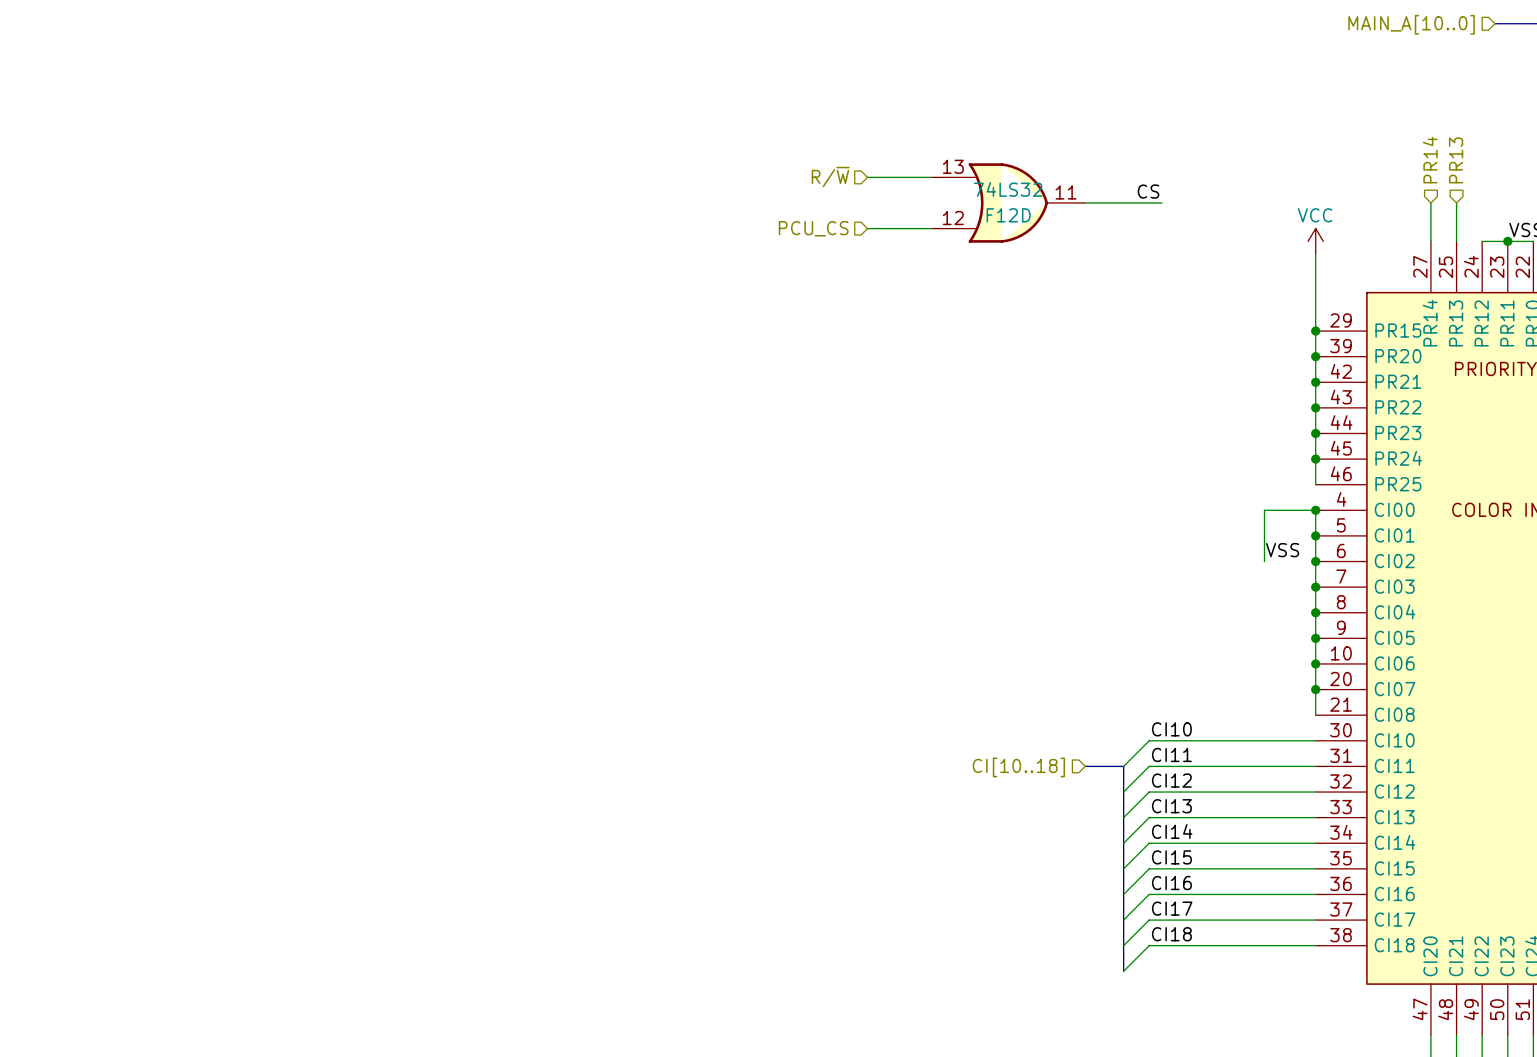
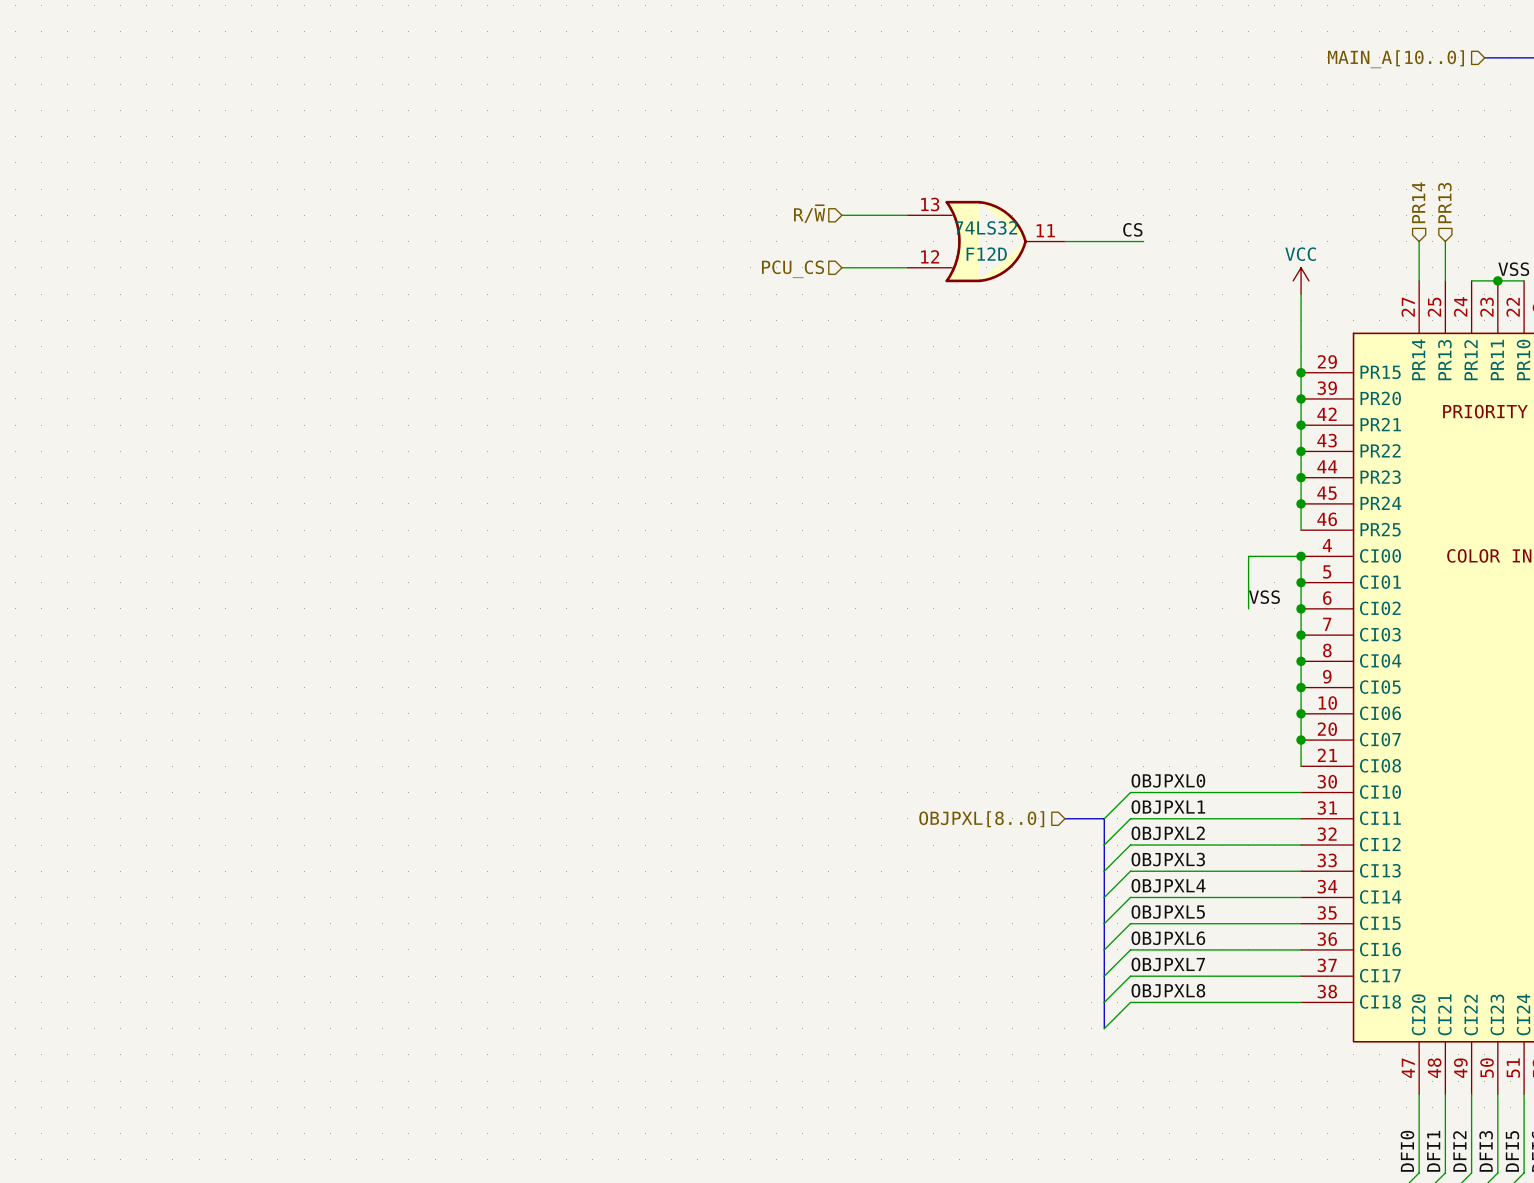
label: CI10 (1171, 729) -> OBJPXL0 (1168, 780)
label: CI11 (1171, 754) -> OBJPXL1 (1168, 807)
hierarchical label: CI[10..18] (1018, 767) -> OBJPXL[8..0] (981, 819)
label: CI12 (1171, 780) -> OBJPXL2 (1168, 833)
label: CI13 (1171, 806) -> OBJPXL3 (1168, 859)
label: CI14 (1172, 831) -> OBJPXL4 (1168, 885)
label: CI15 (1171, 857) -> OBJPXL5 (1168, 912)
label: CI16 (1171, 883) -> OBJPXL6 (1168, 938)
label: CI17 (1172, 908) -> OBJPXL7 (1168, 964)
label: CI18 (1171, 934) -> OBJPXL8 (1168, 990)

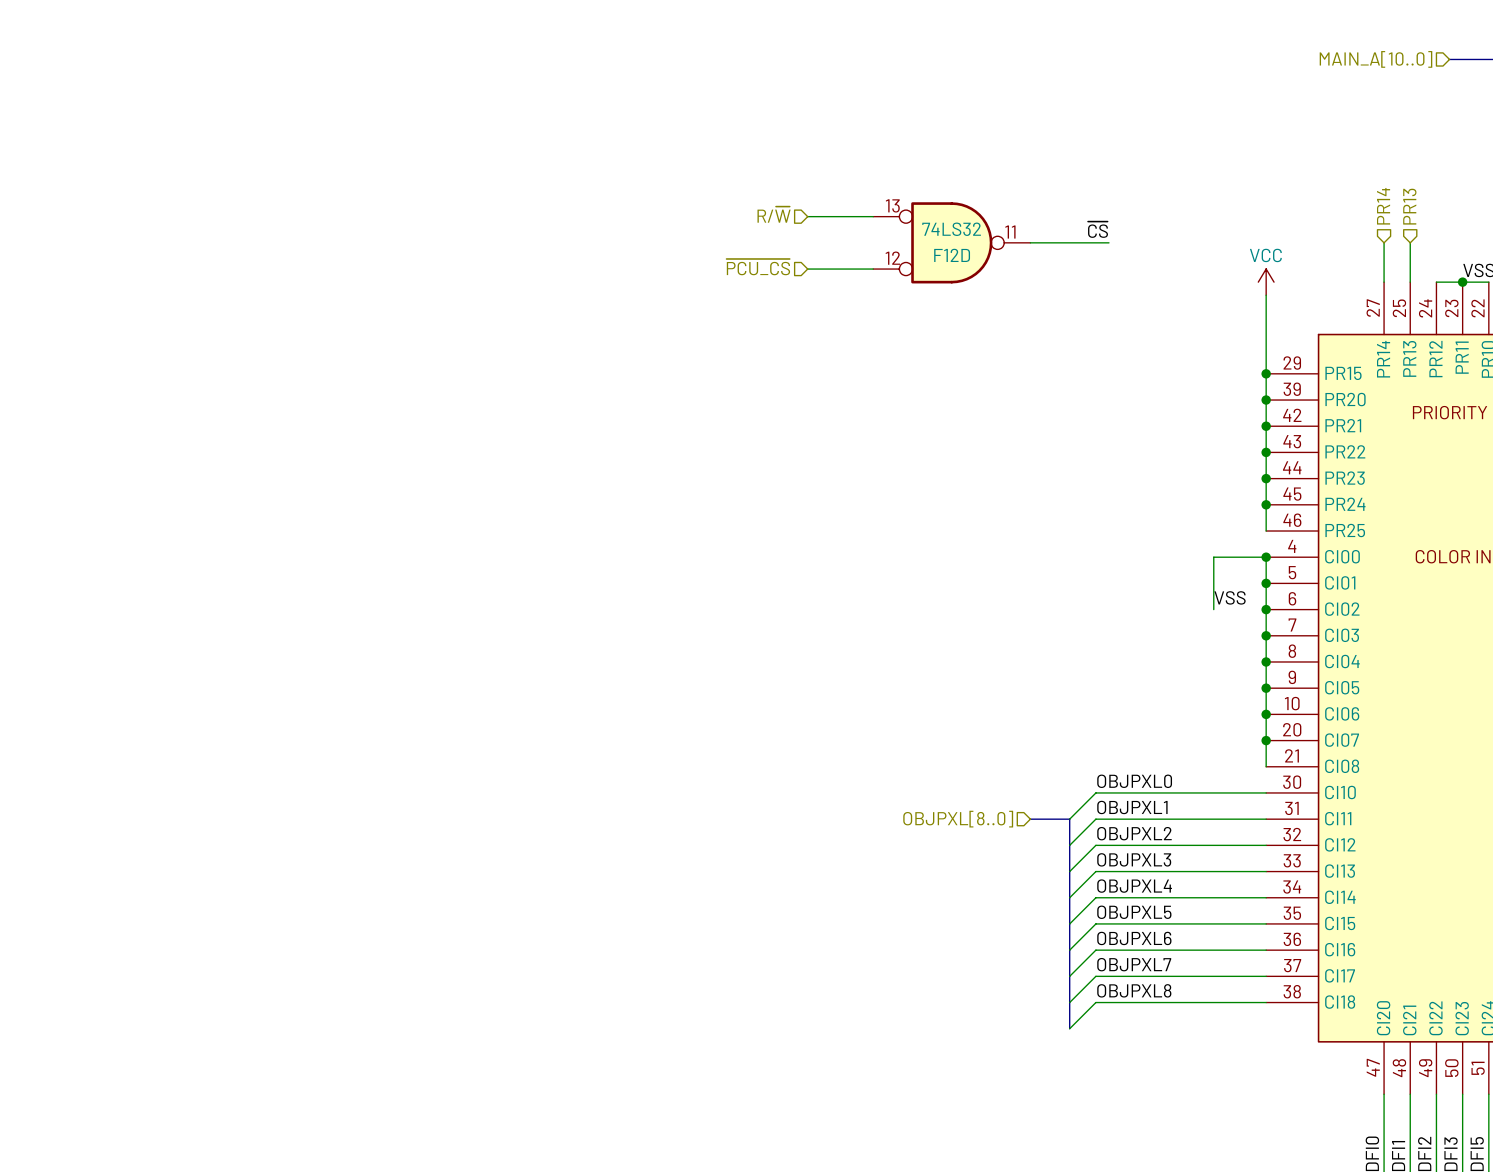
F12D symbol: [907, 200, 1065, 283] -> [873, 202, 1031, 284]
label: CS (1132, 229) -> ~{CS} (1097, 229)
hierarchical label: PCU_CS (793, 269) -> ~{PCU_CS} (758, 267)

